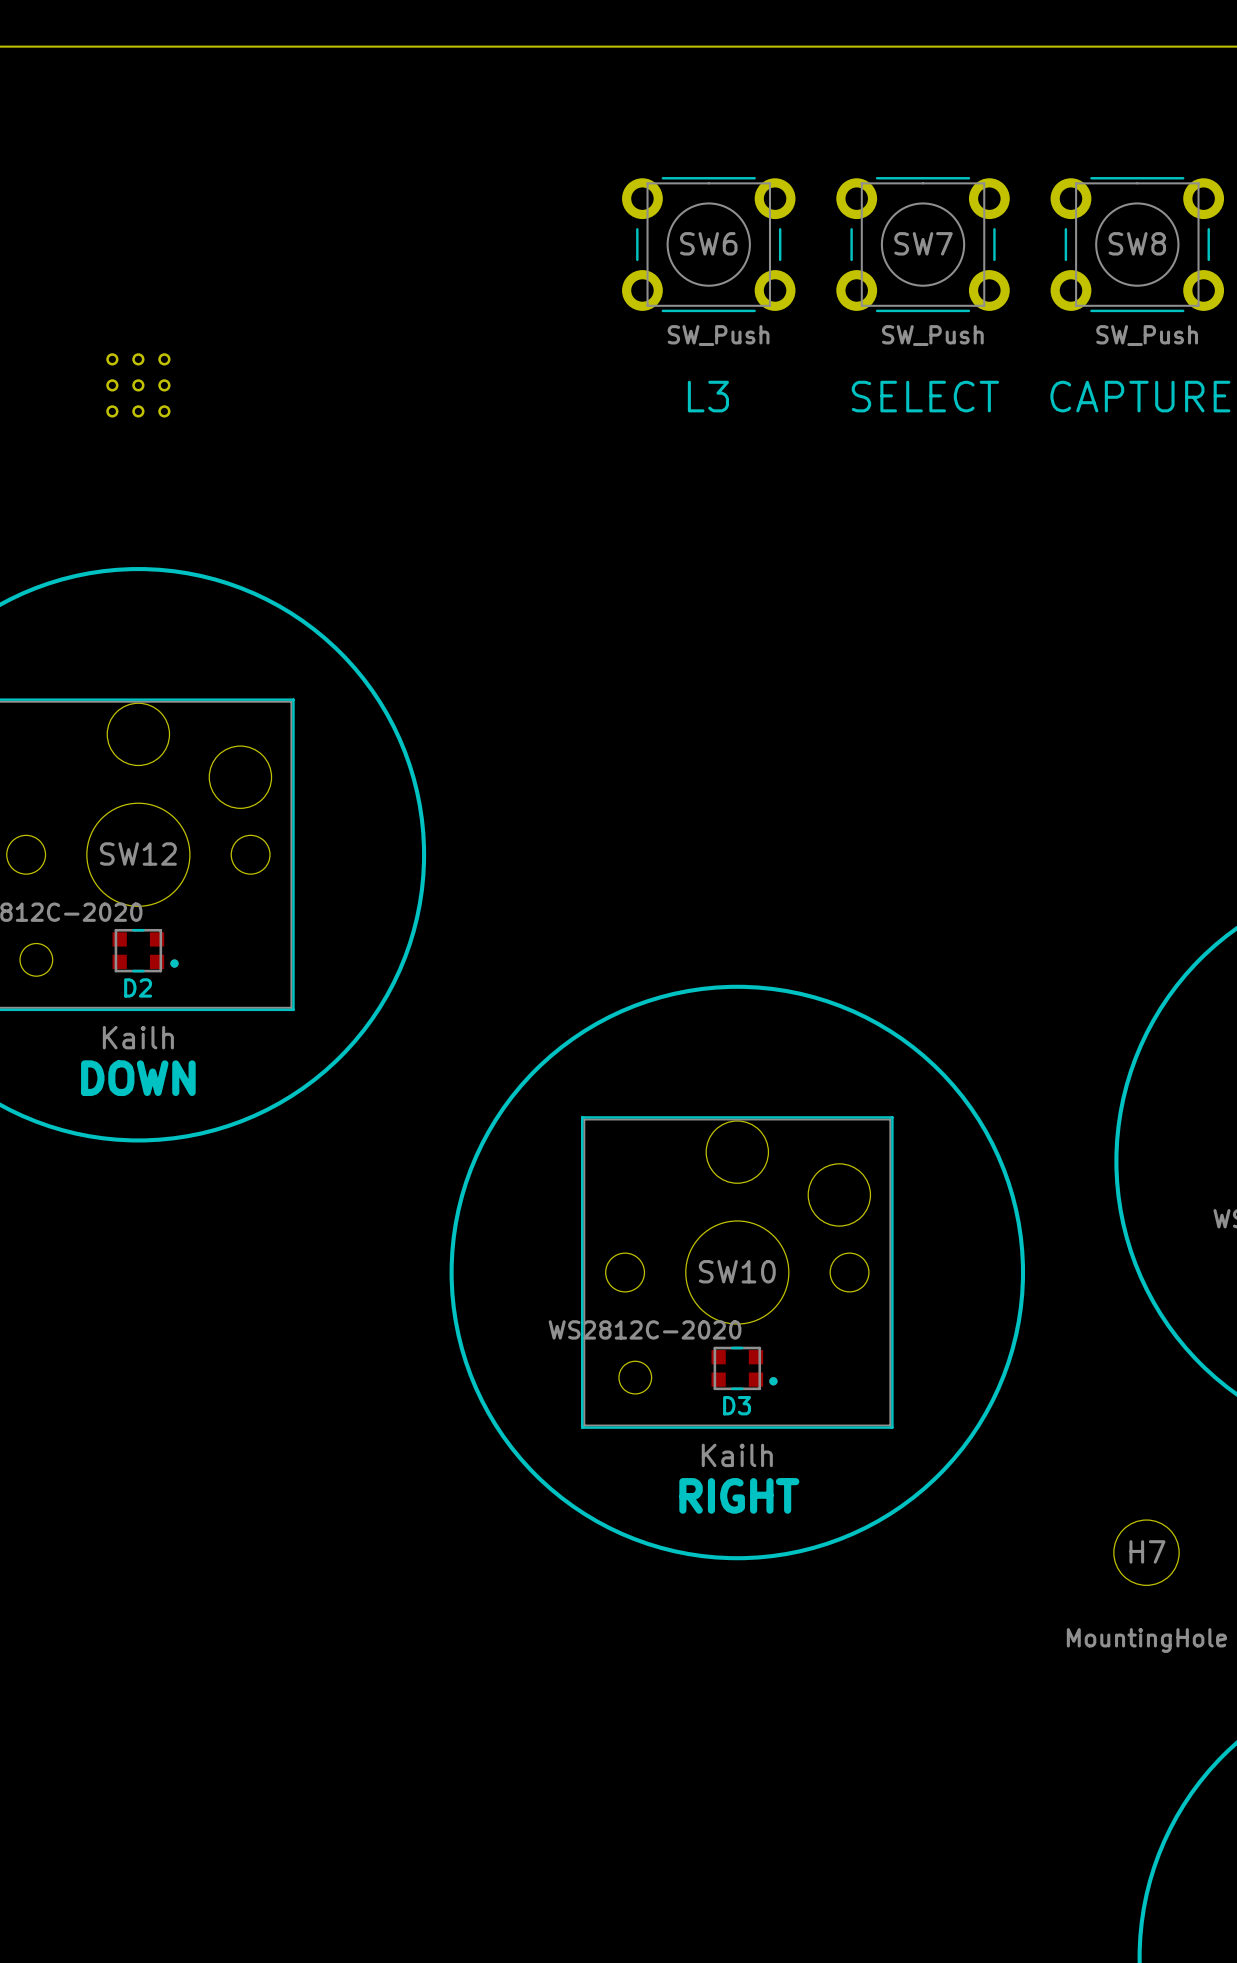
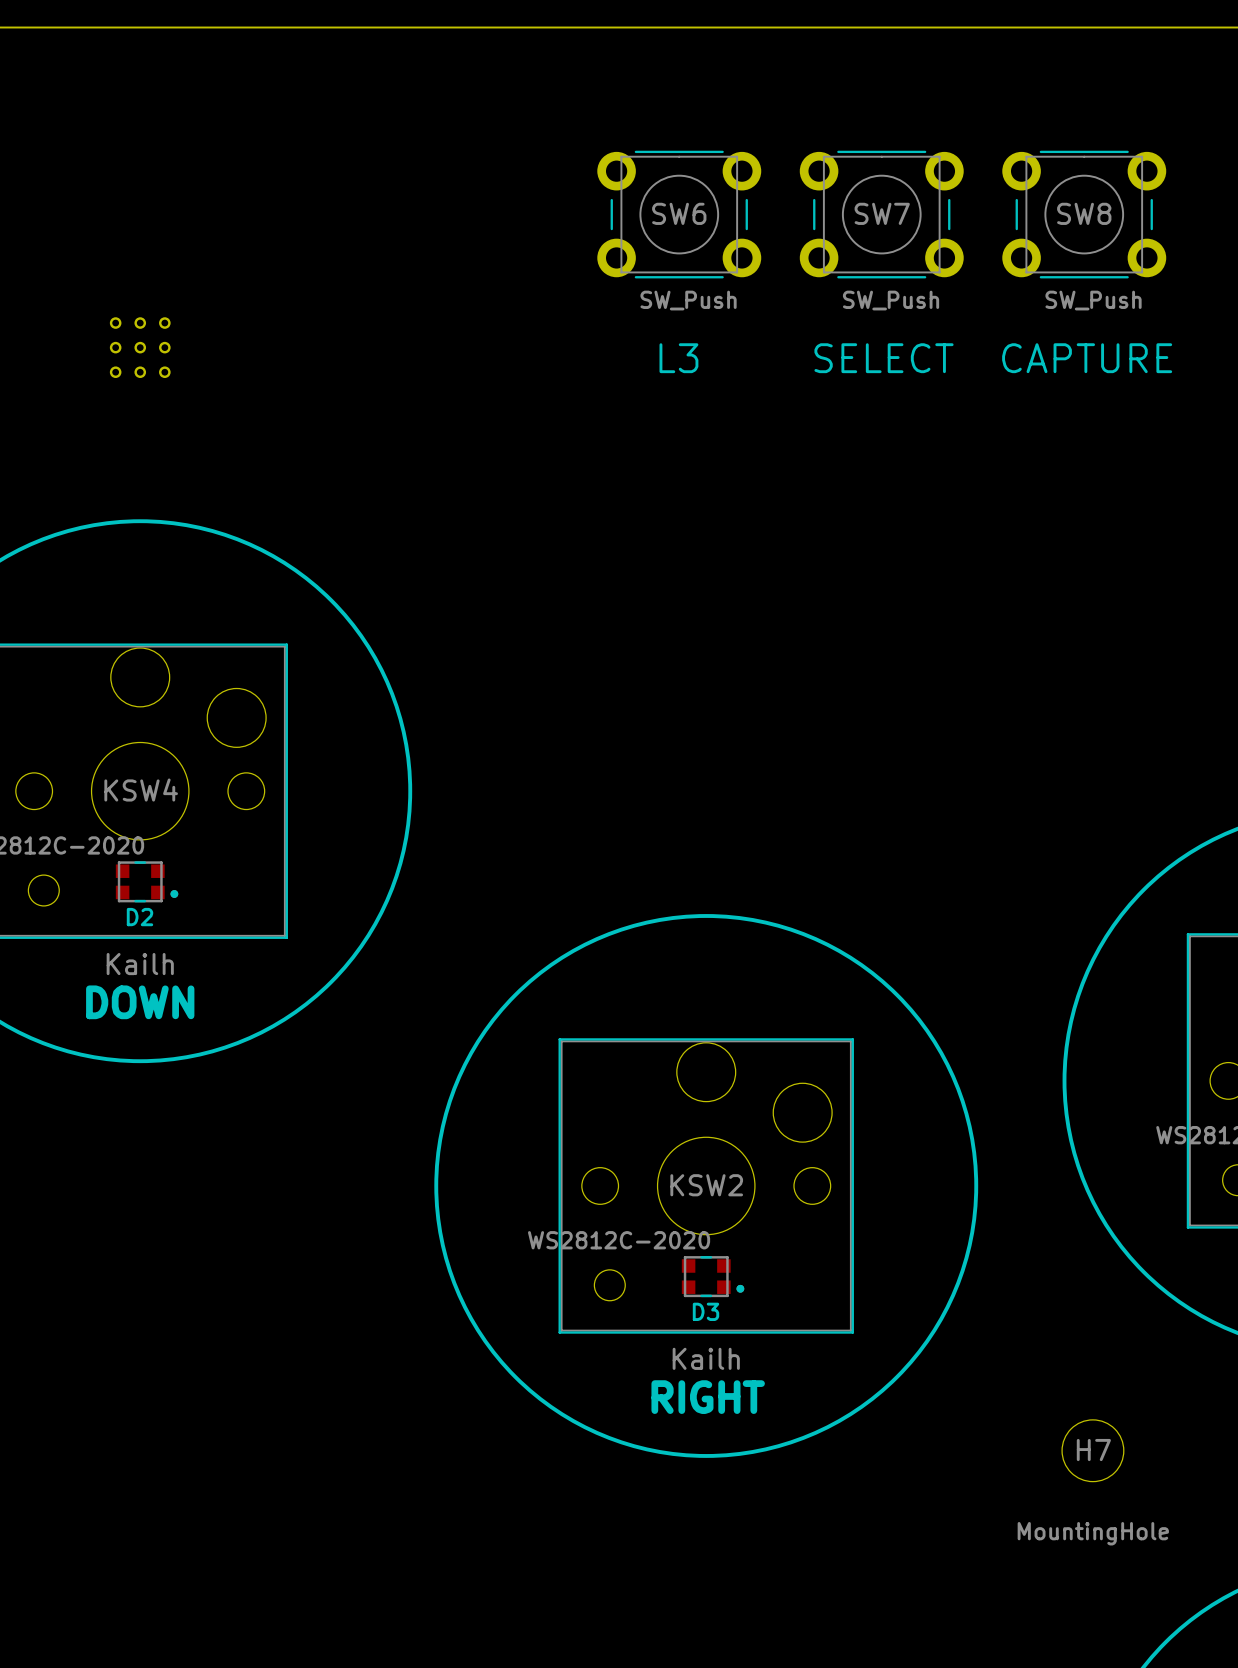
SW12 name: SW12 (138, 853) -> KSW4 (141, 790)
SW10 name: SW10 (737, 1271) -> KSW2 (706, 1185)

